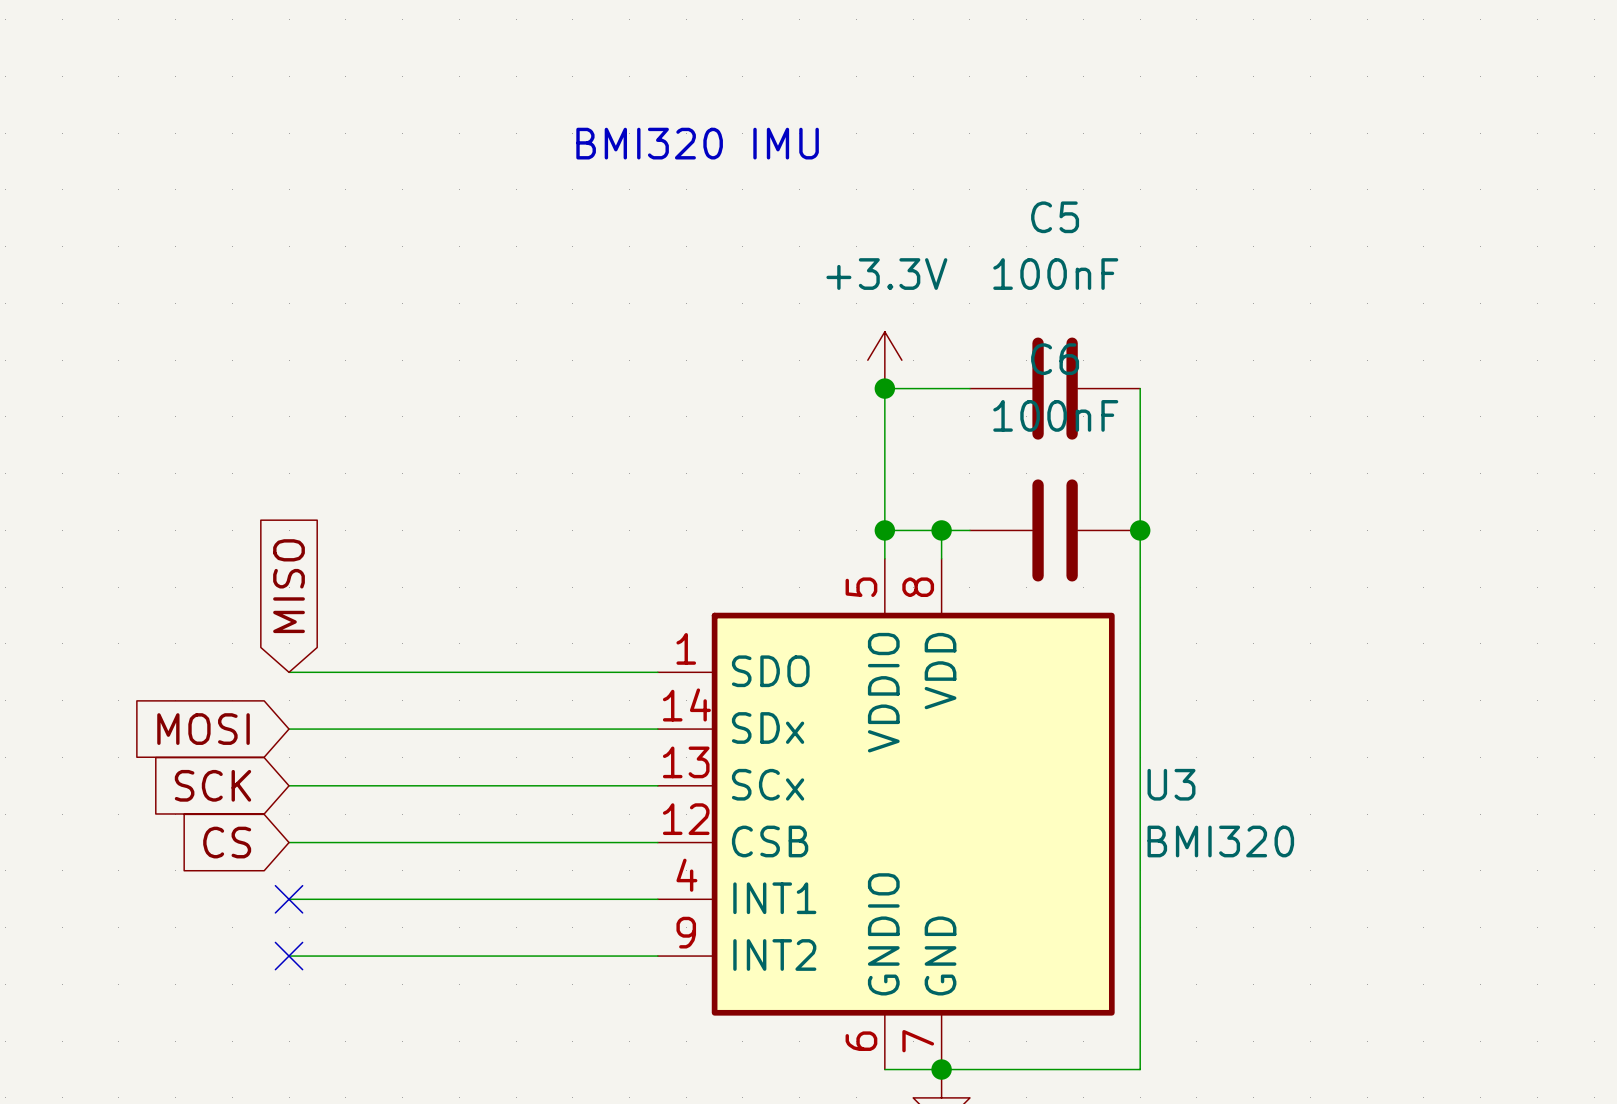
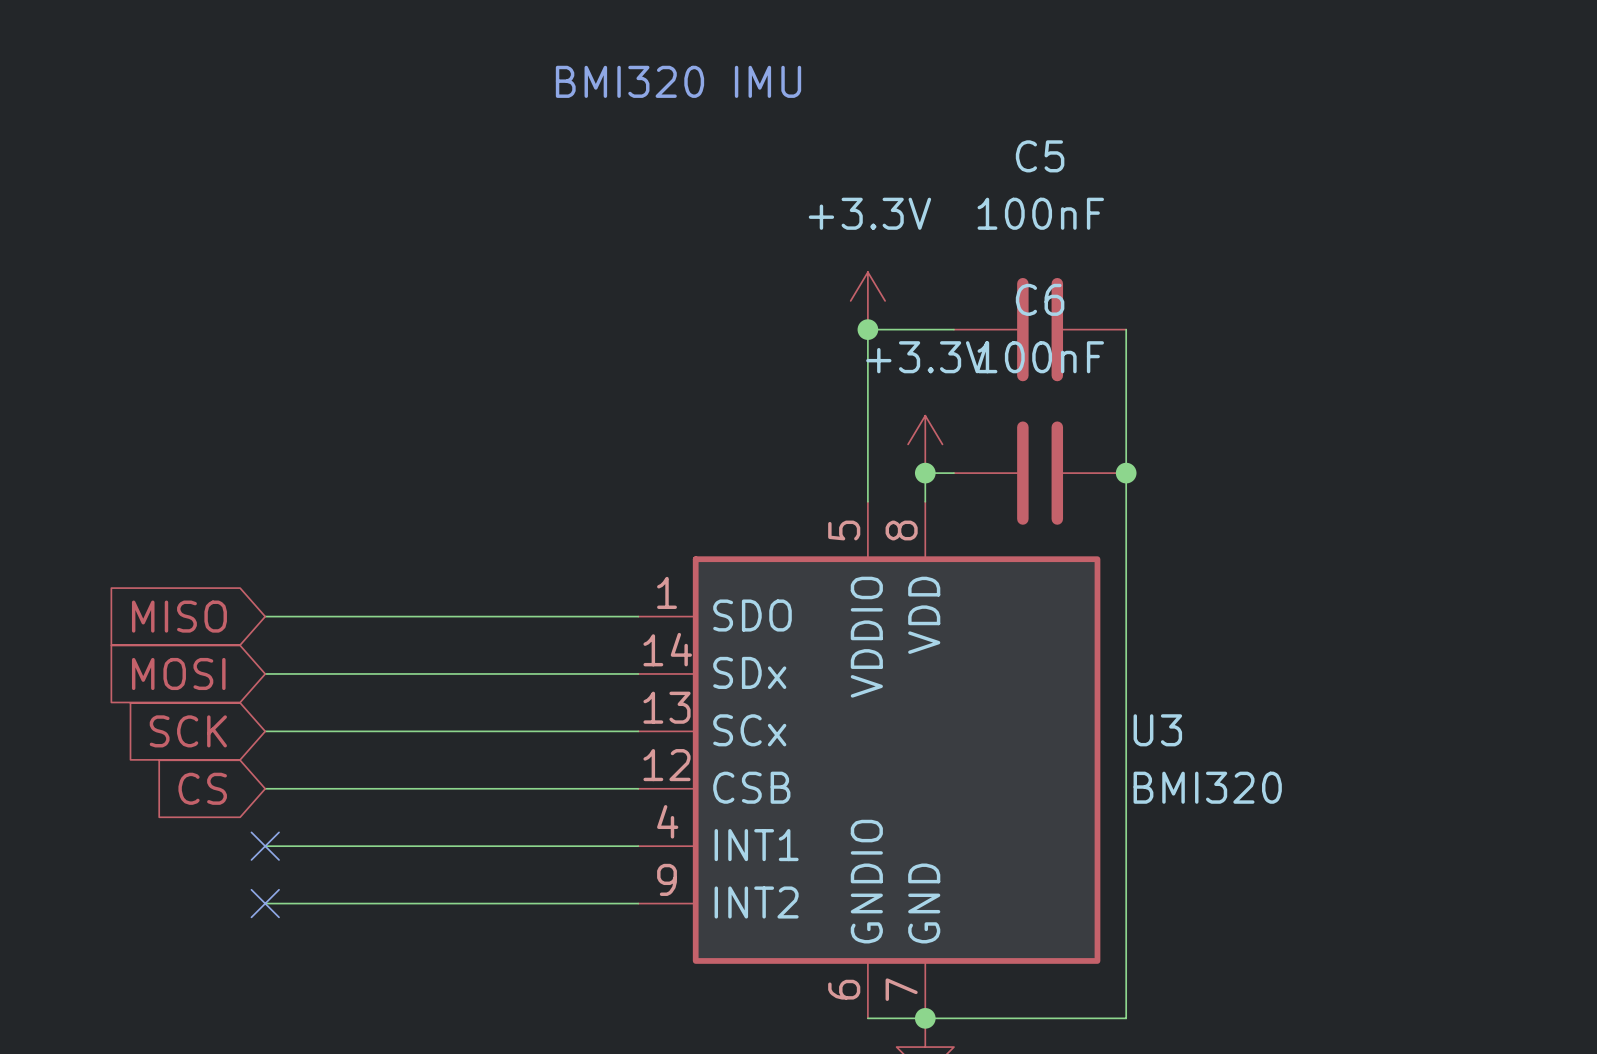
power symbol: none -> +3.3V (925, 444)
wire: (884, 530) (941, 530) -> none
junction: (884, 530) -> none
global label rotation: 0° (289, 586) -> 90° counterclockwise (179, 616)

